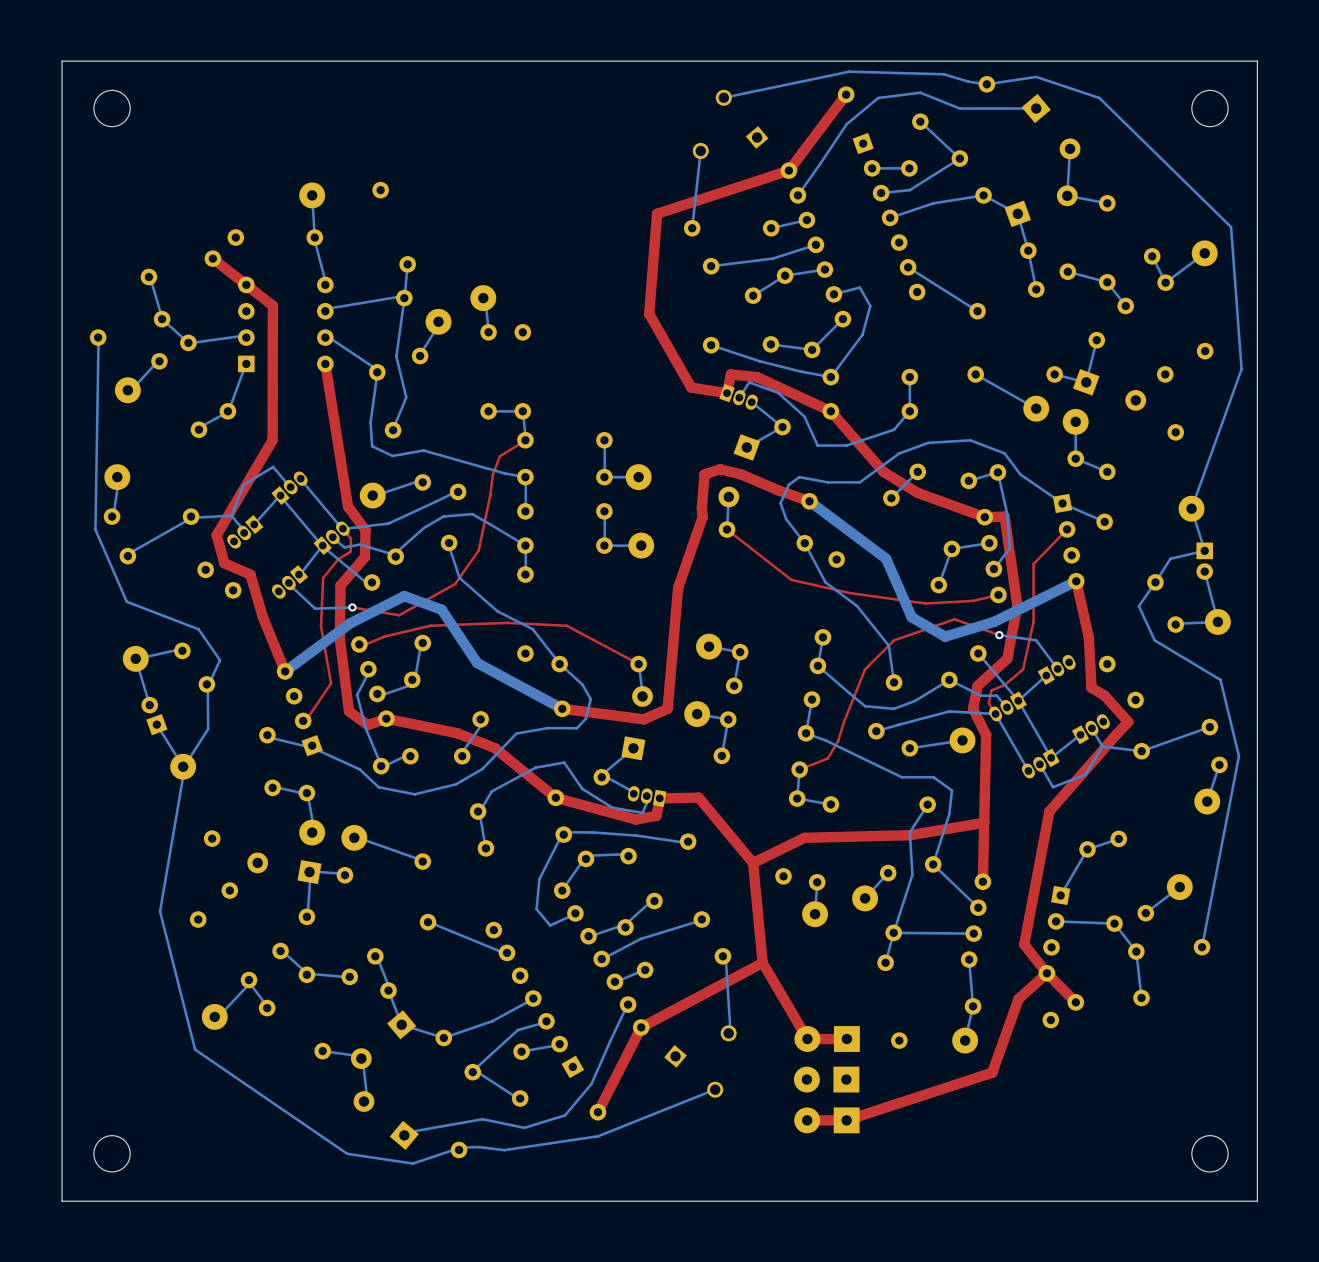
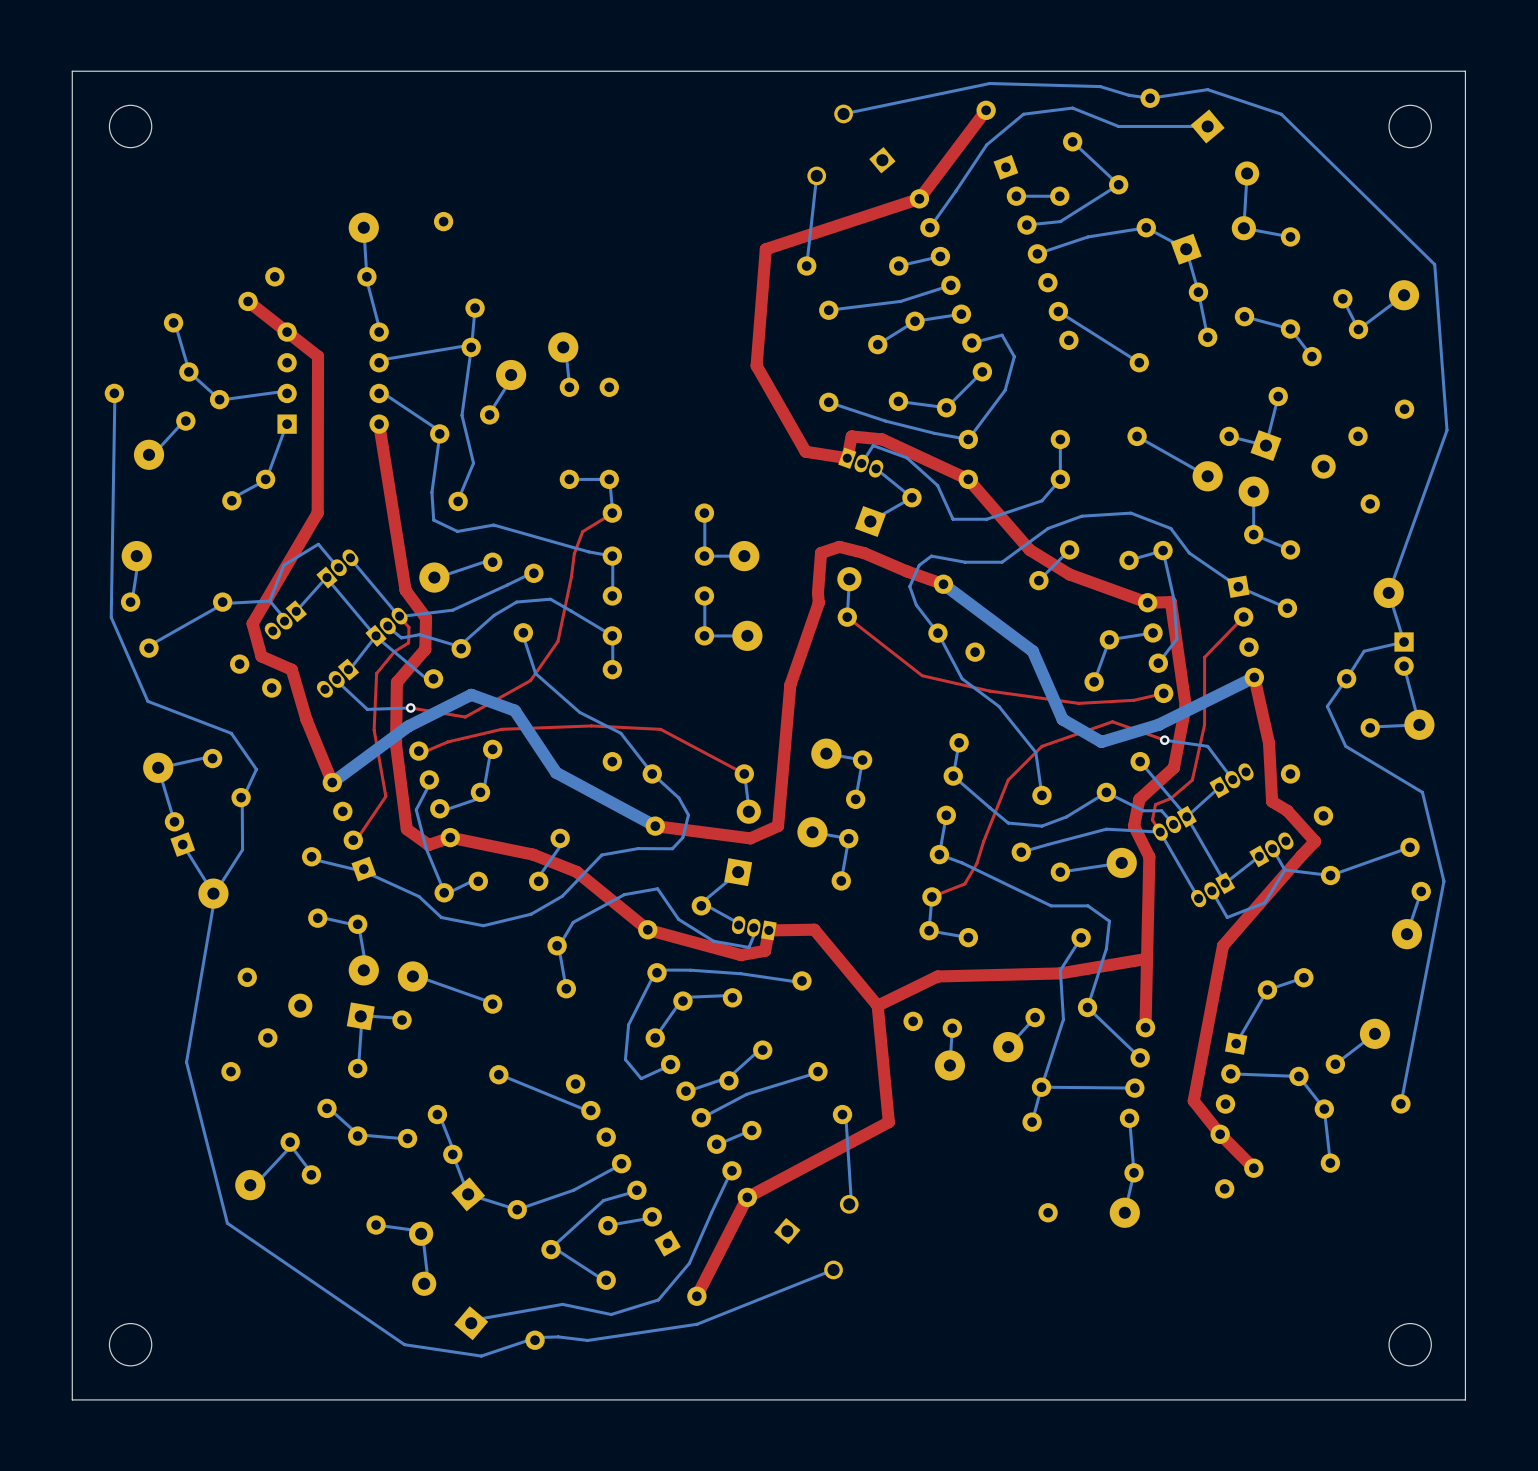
top track: (762, 962) (807, 1039) (846, 1039) -> none
top track: (1046, 973) (1018, 998) (992, 1072) (846, 1120) (807, 1120) -> none
part: (827, 1039) -> none
part: (826, 1079) -> none
part: (826, 1120) -> none

